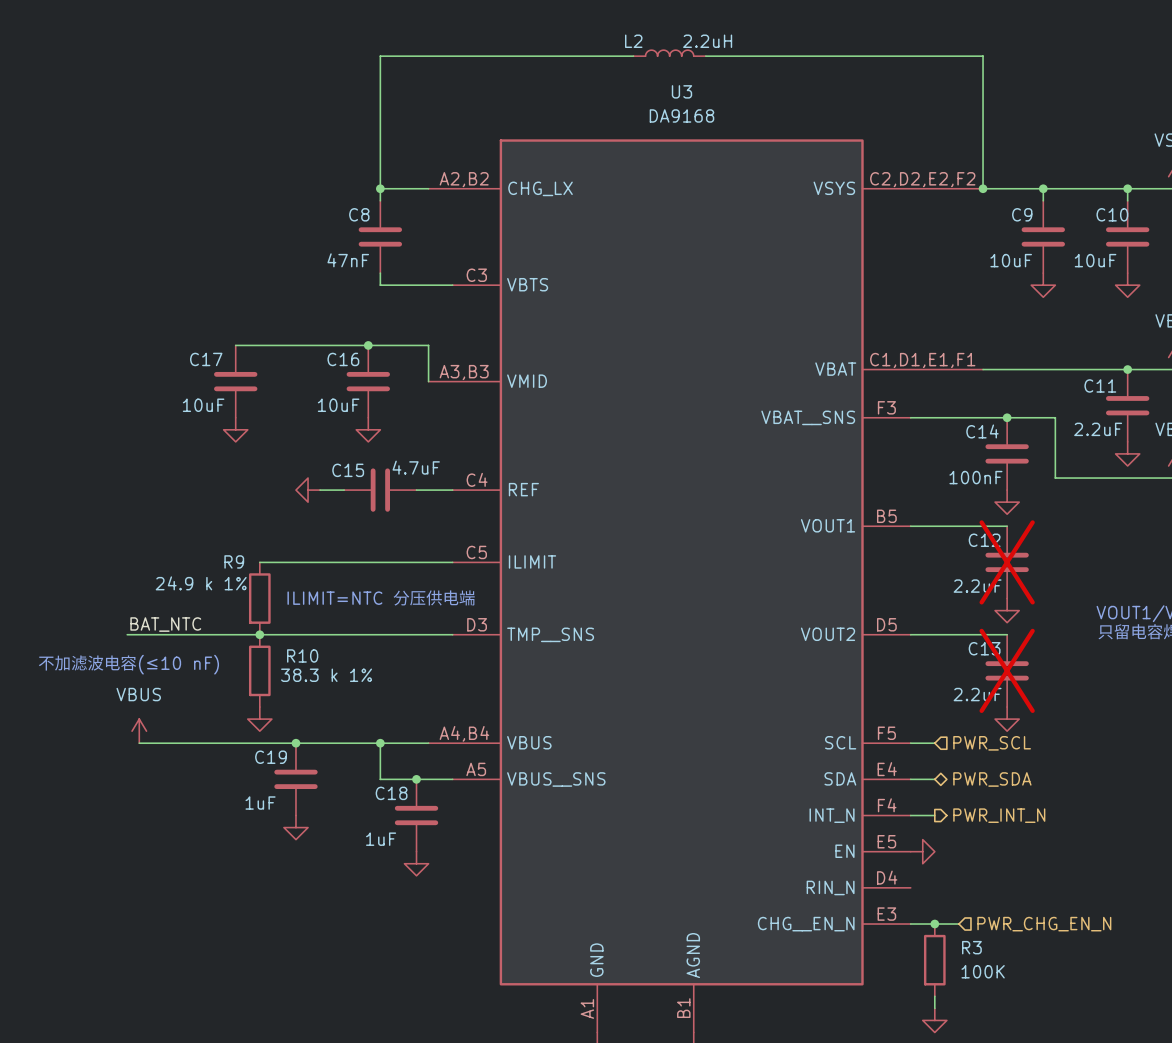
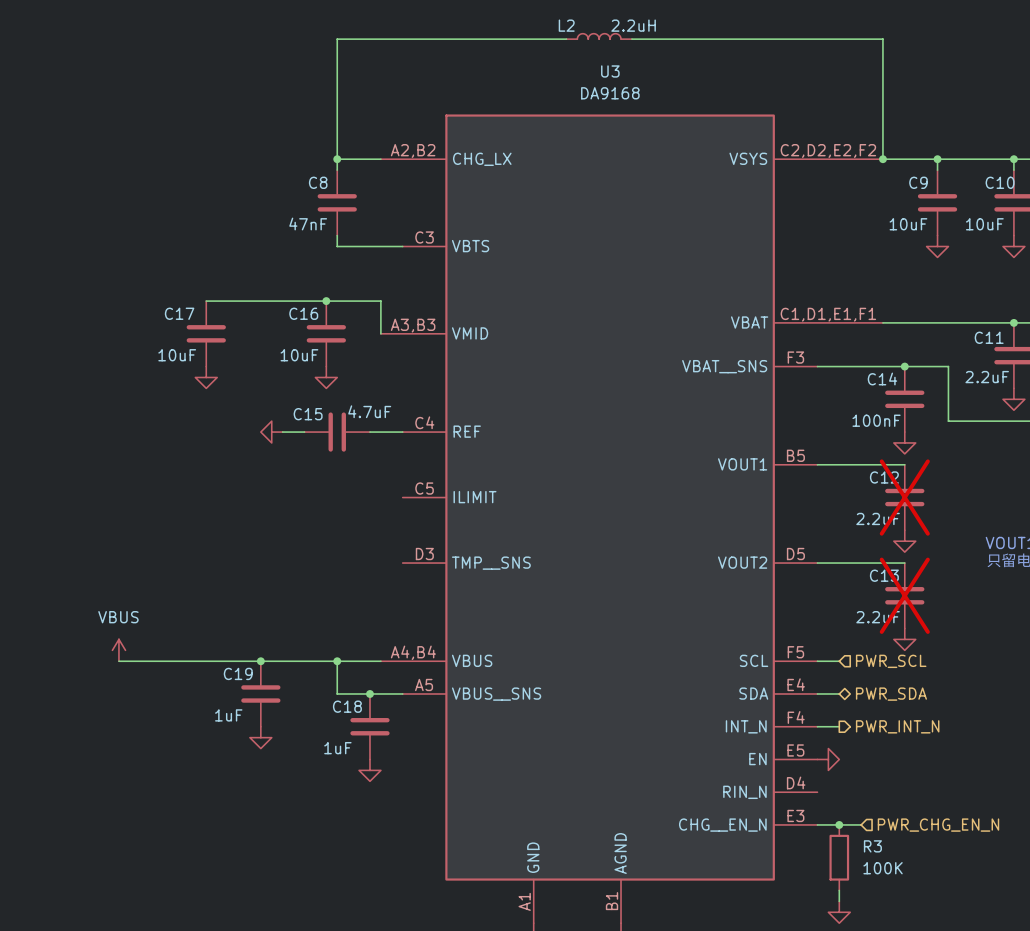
wire: (259, 562) (452, 562) -> none
text: ILIMIT=NTC 分压供电端 (381, 597) -> none
R9: 24.9 k 1% (259, 598) -> none
label: BAT_NTC (165, 624) -> none
wire: (127, 634) (452, 634) -> none
junction: (259, 634) -> none
text: 不加滤波电容(≤10 nF) (128, 664) -> none
R10: 38.3 k 1% (259, 670) -> none
power symbol: (259, 719) -> none

